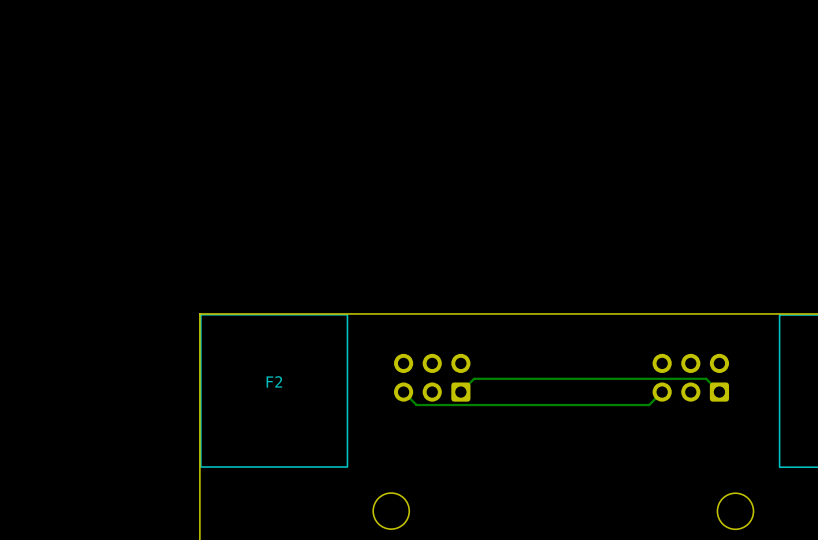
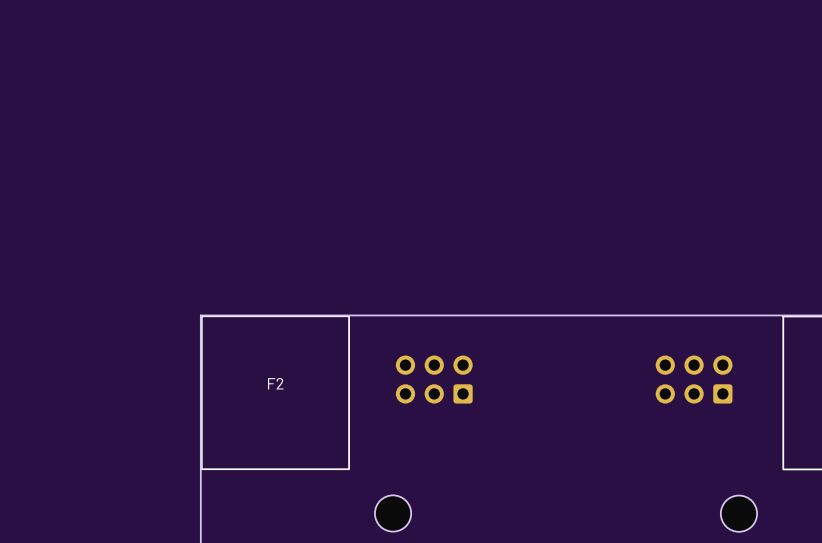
track: (662, 392) (649, 405) (416, 405) (403, 392) -> none
track: (719, 392) (706, 378) (474, 378) (460, 392) -> none

